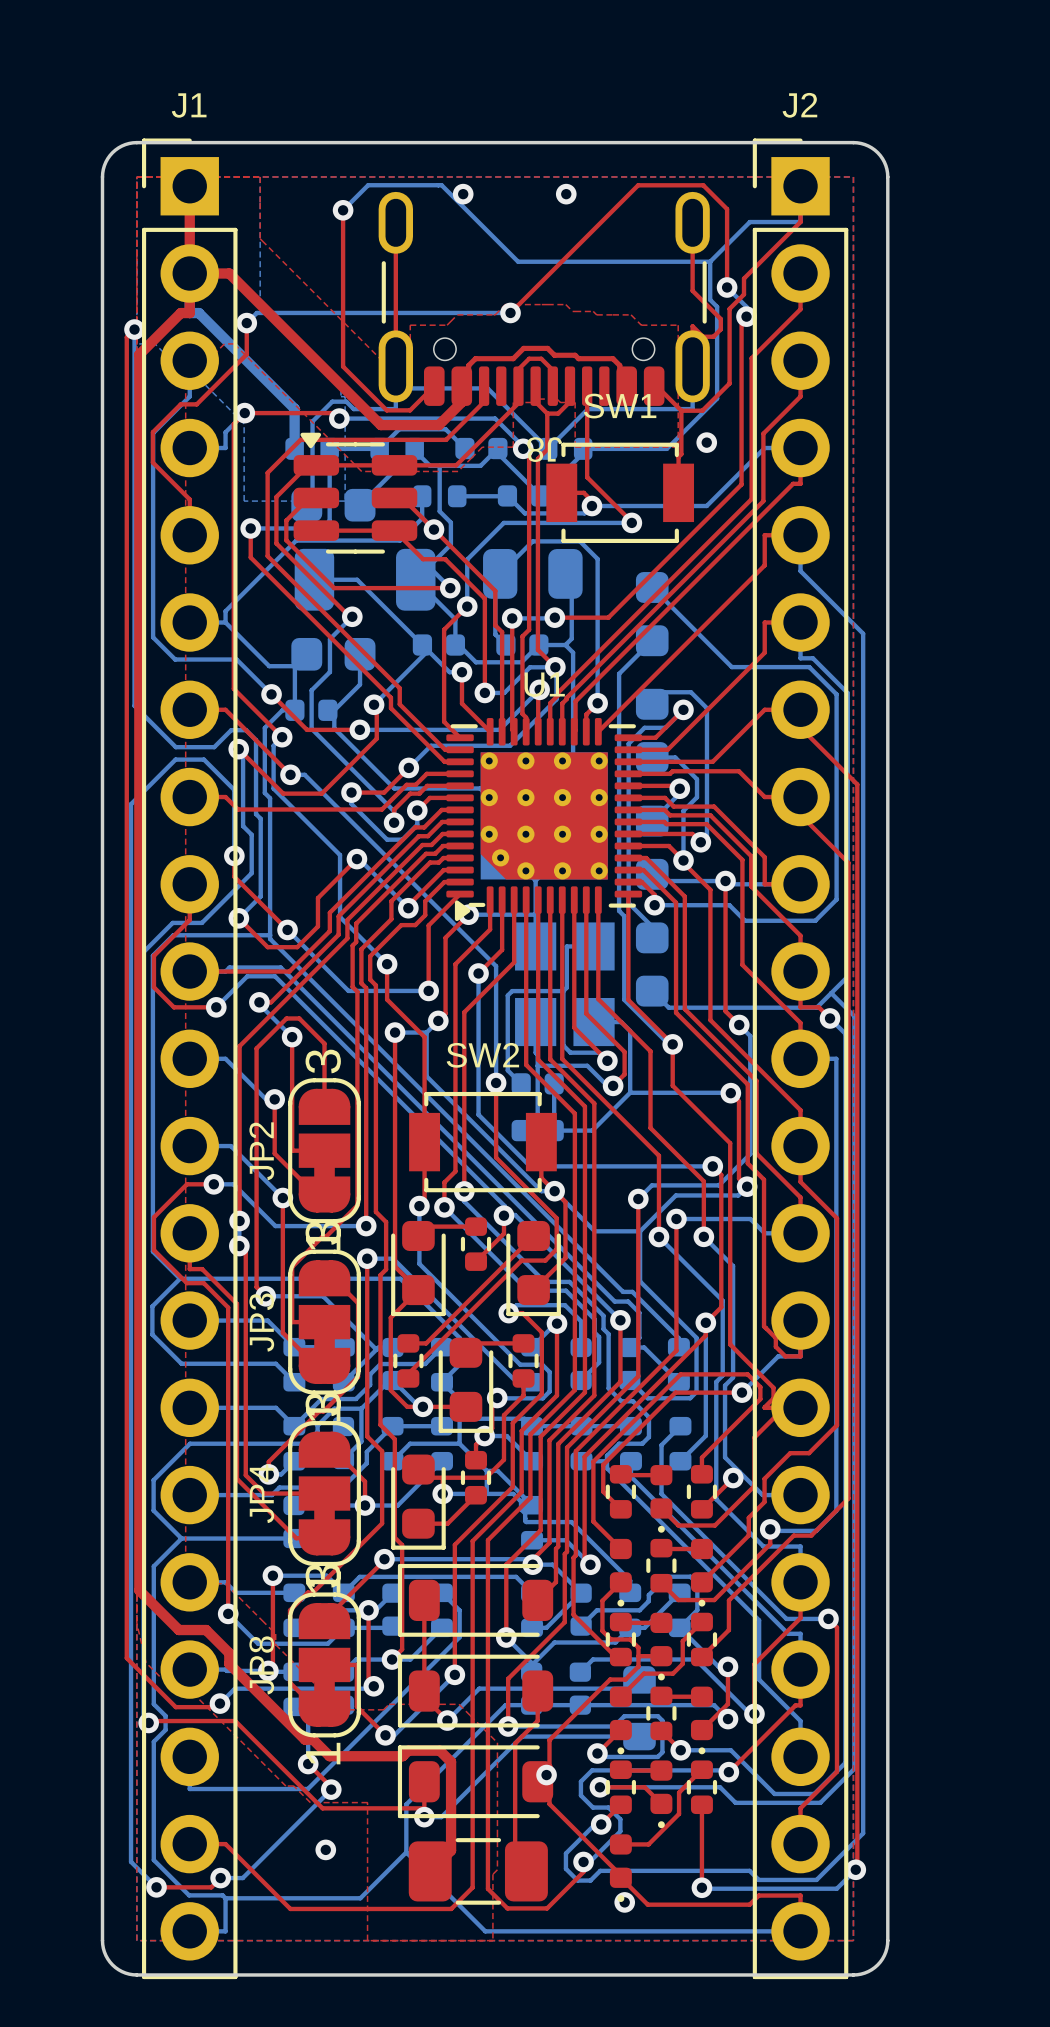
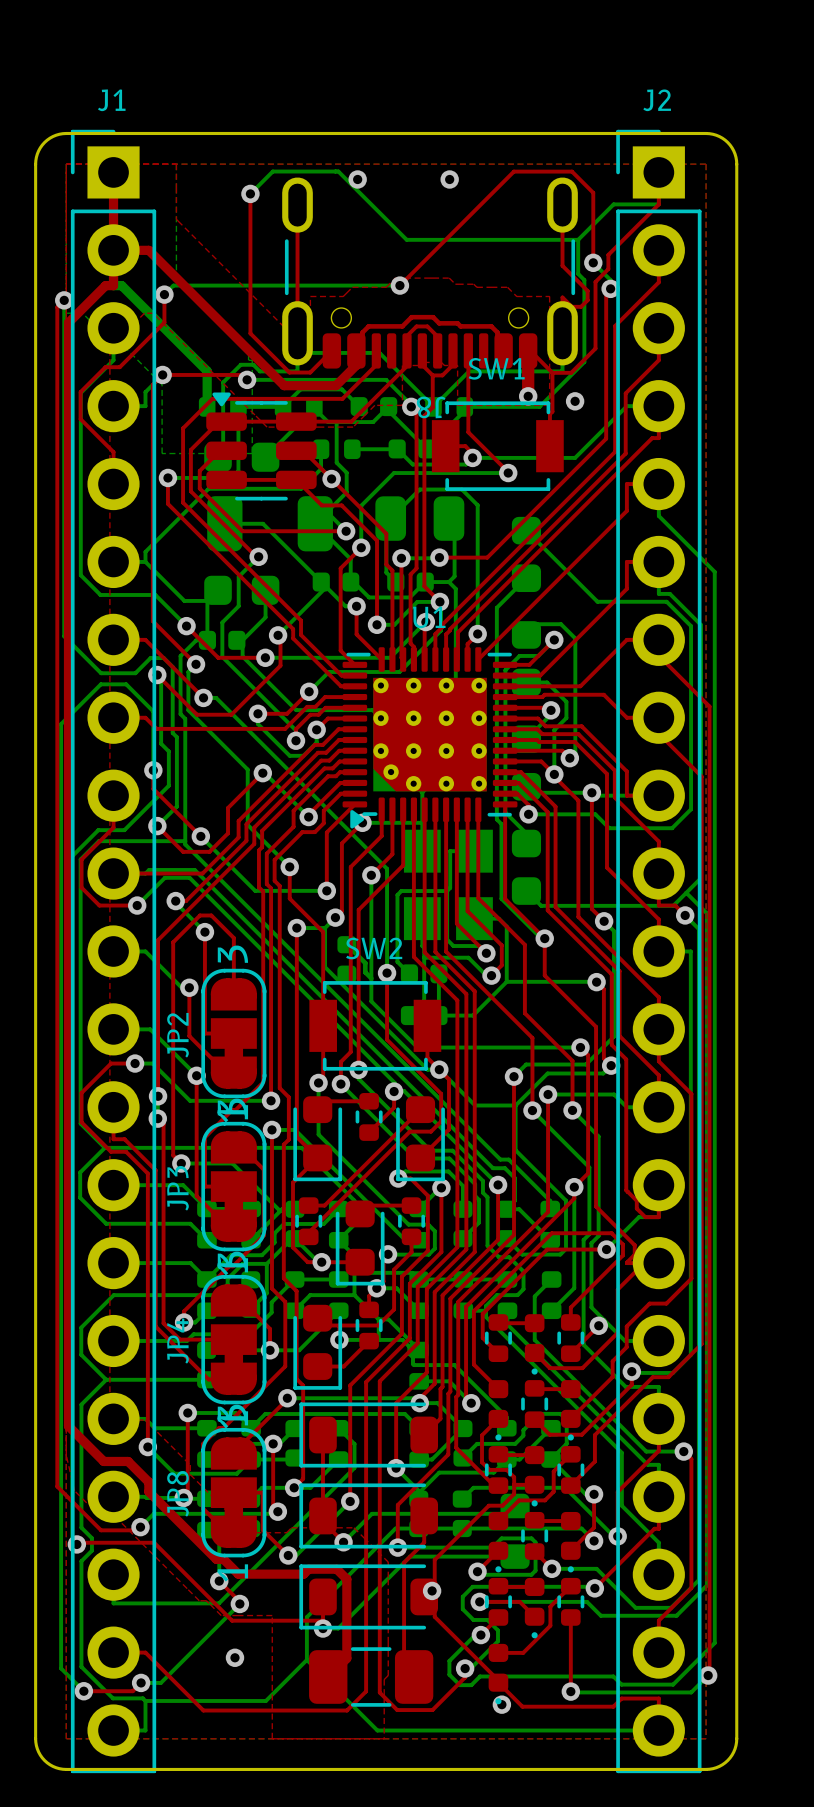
top track: none -> (528, 360) (528, 396)
via: none -> (528, 396)
bottom track: none -> (353, 950) (365, 963) (365, 972) (371, 978)
part: none -> (346, 959)

